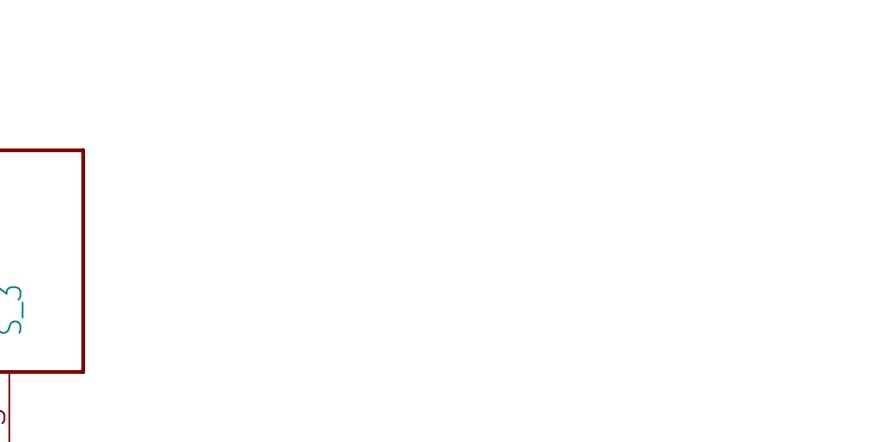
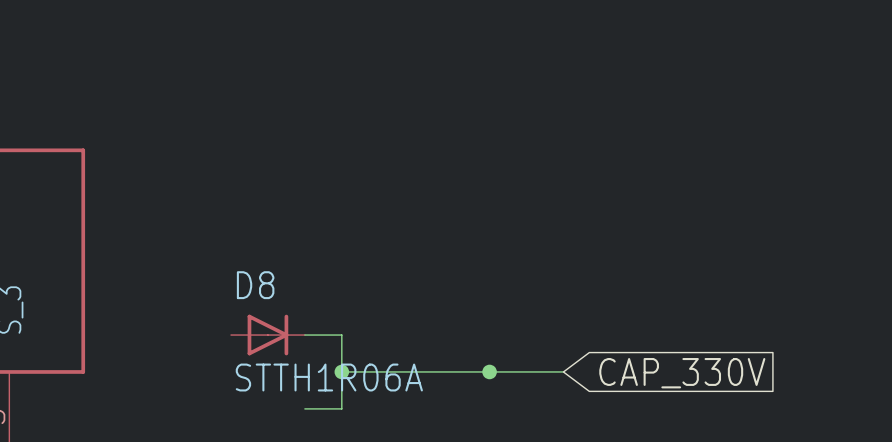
D8: none -> STTH1R06A (267, 335)
wire: none -> (304, 335) (341, 335) (341, 408) (304, 408)
wire: none -> (341, 371) (563, 371)
junction: none -> (341, 371)
junction: none -> (489, 371)
global label: none -> CAP_330V (682, 373)

